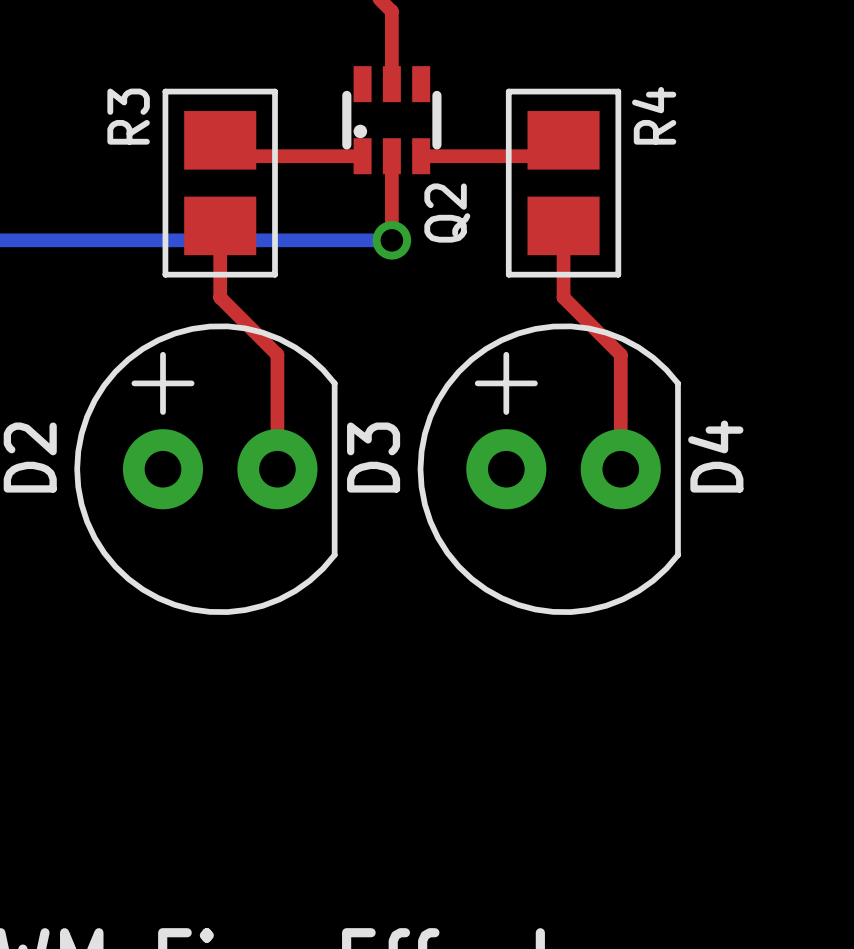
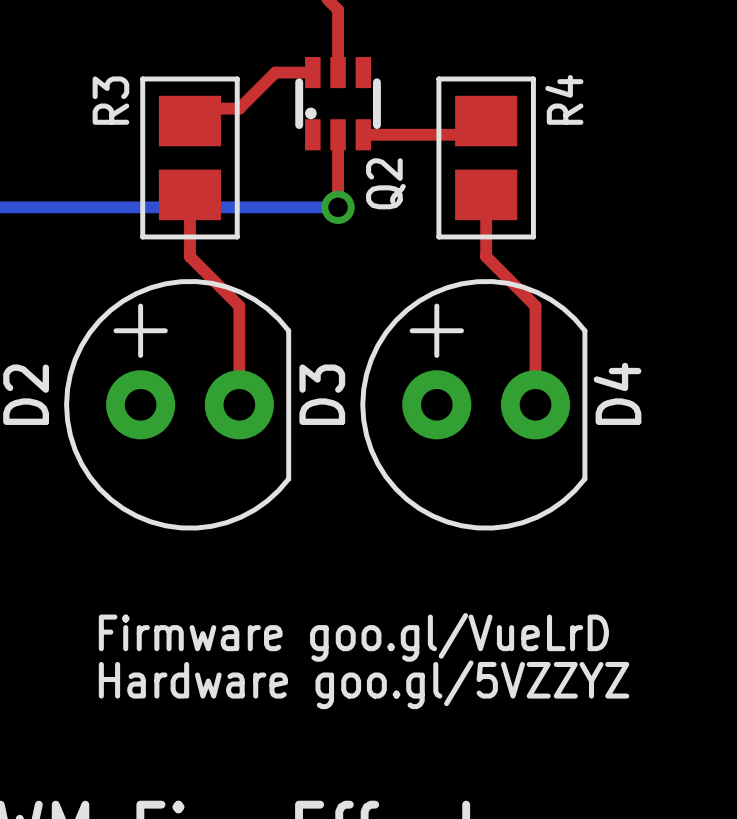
top track: (220, 140) (236, 156) (362, 156) -> (189, 121) (202, 108) (239, 108) (275, 72) (312, 72)
text: none -> Firmware goo.gl/VueLrD (353, 637)
text: none -> Hardware goo.gl/5VZZYZ (364, 684)

